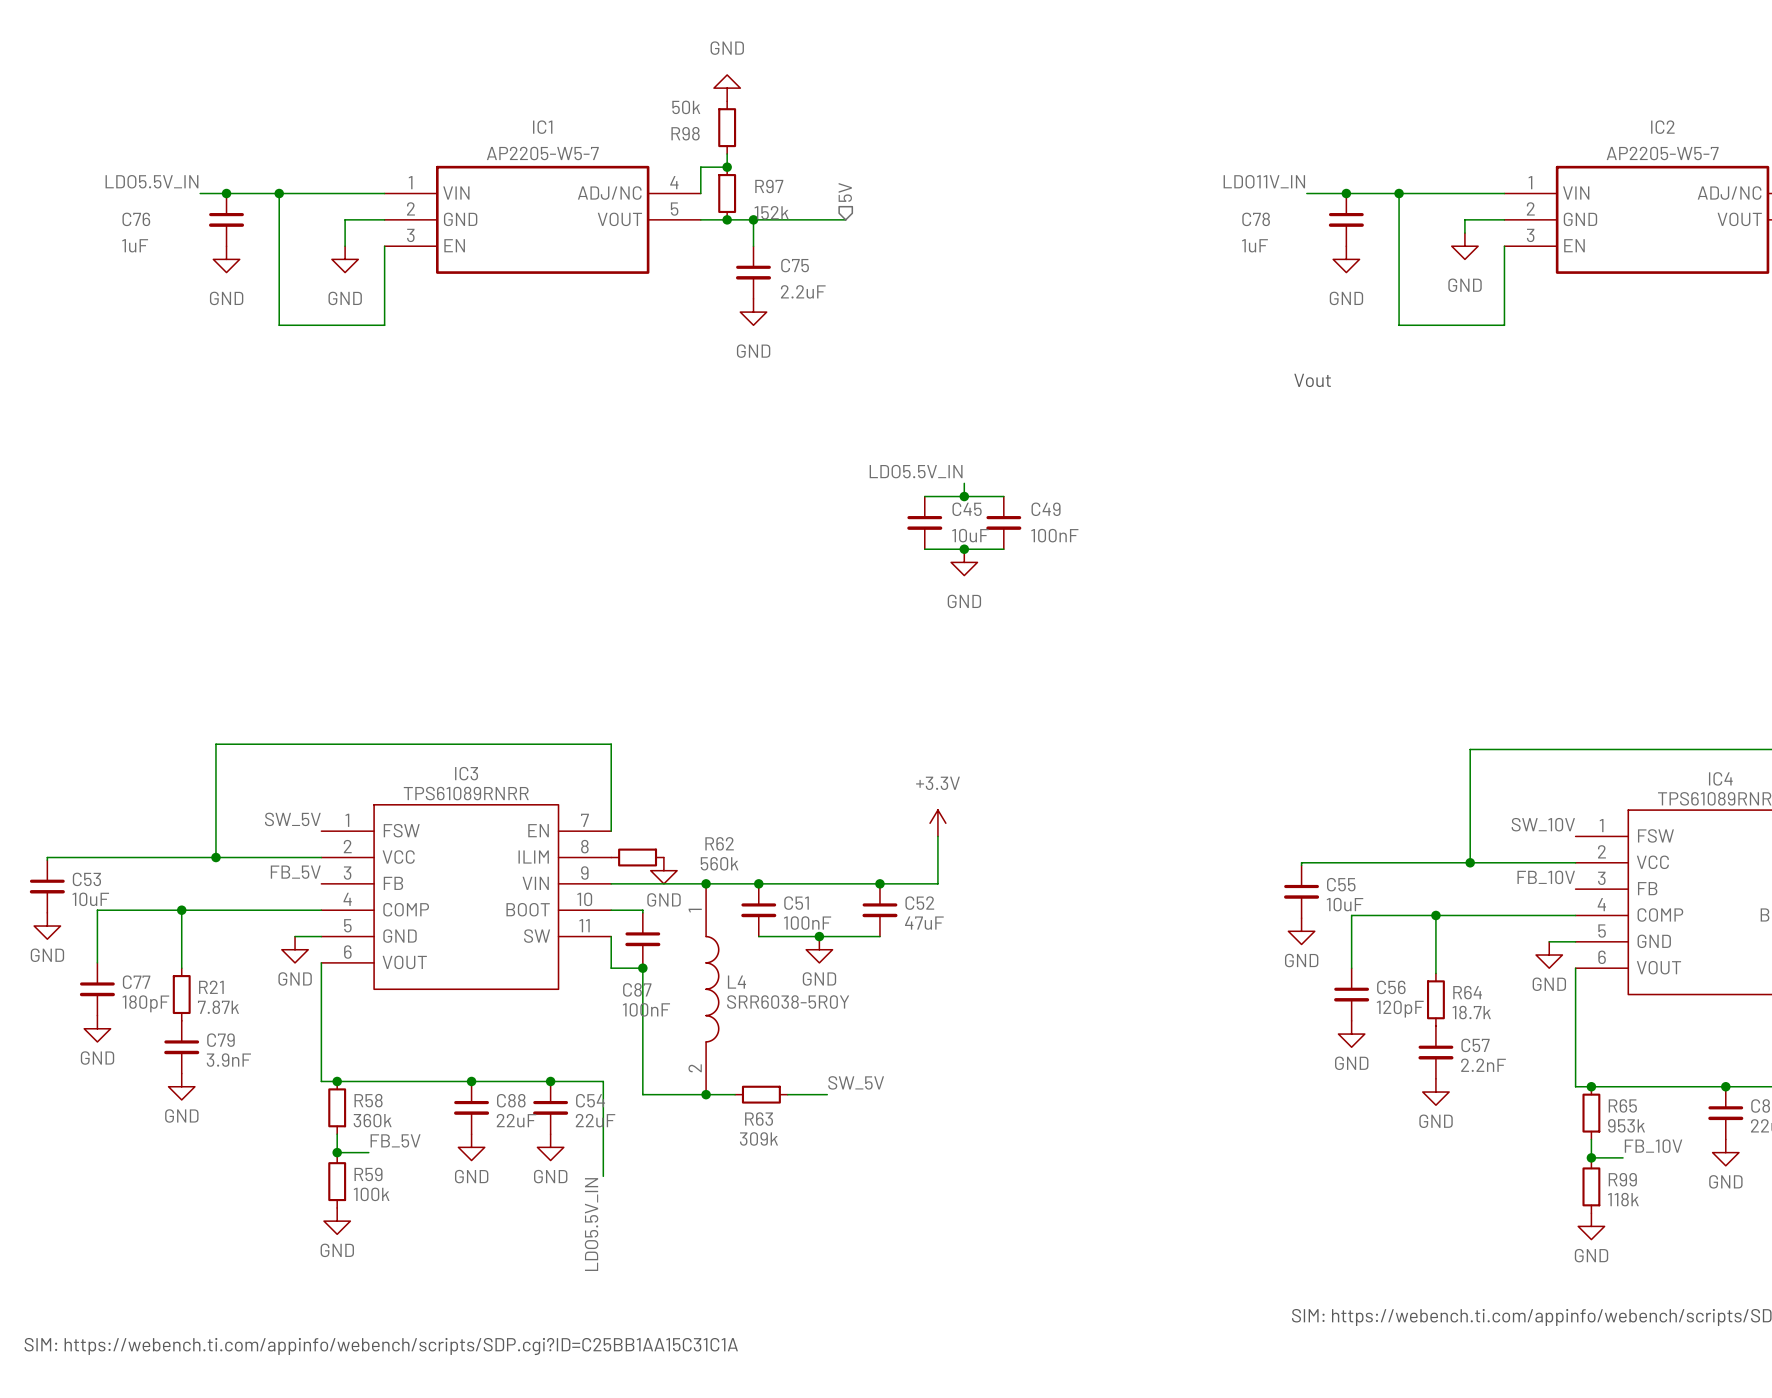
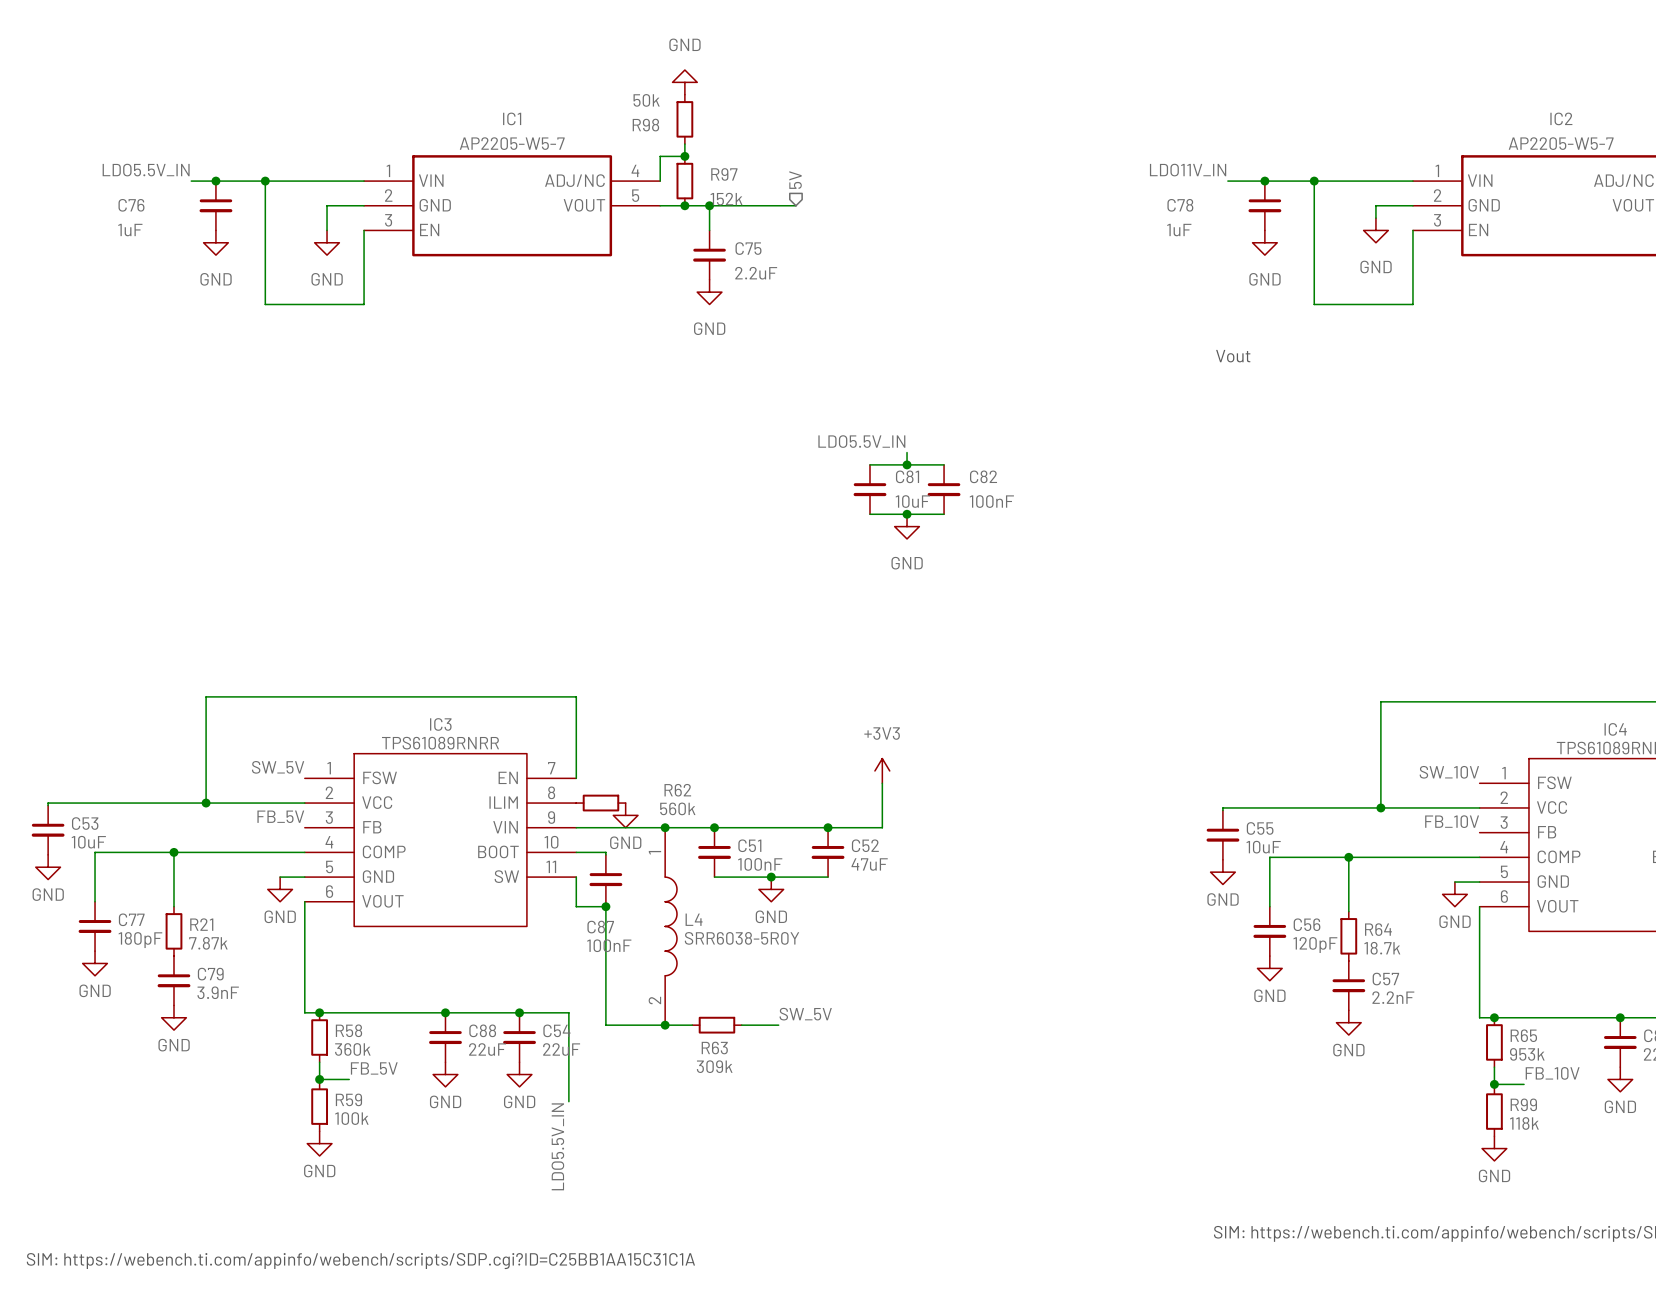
C45 name: C45 (967, 509) -> C81 (907, 476)
C49 name: C49 (1046, 509) -> C82 (983, 476)
power symbol: +3.3V (937, 823) -> +3V3 (882, 770)

